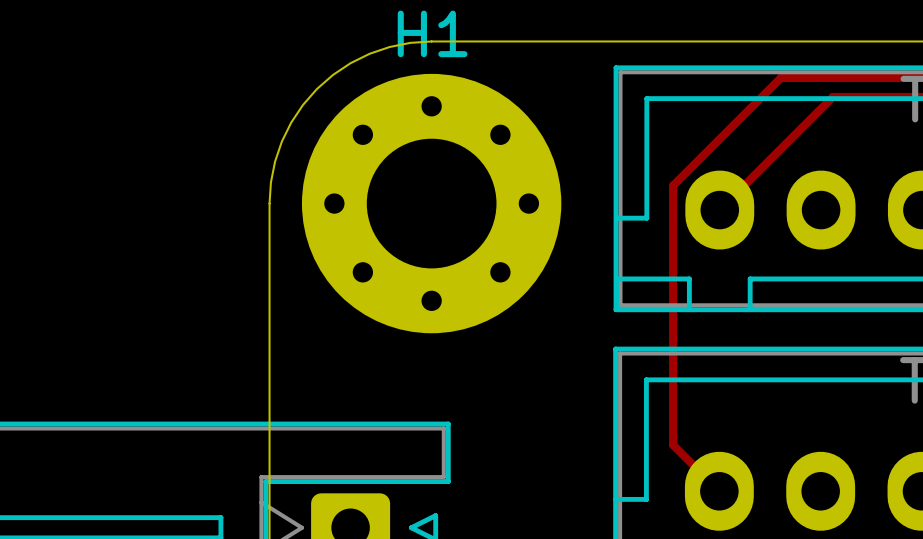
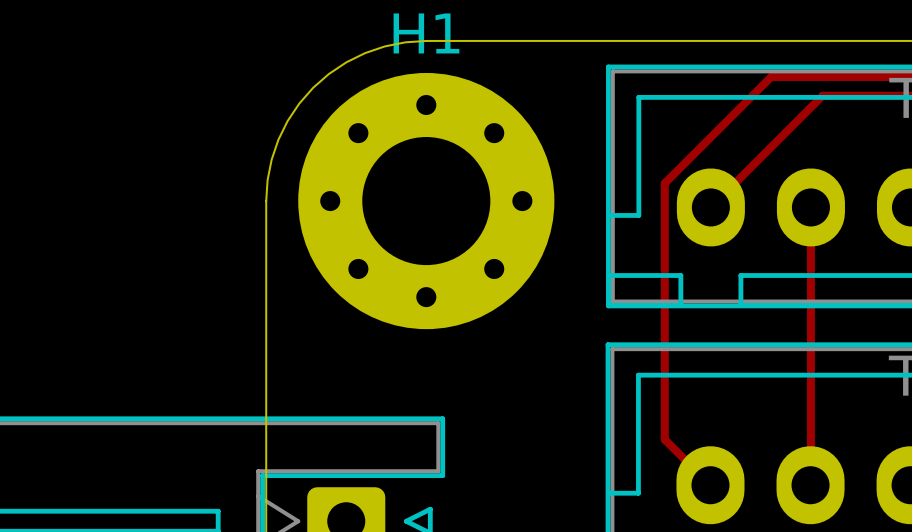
track: none -> (810, 207) (810, 484)

